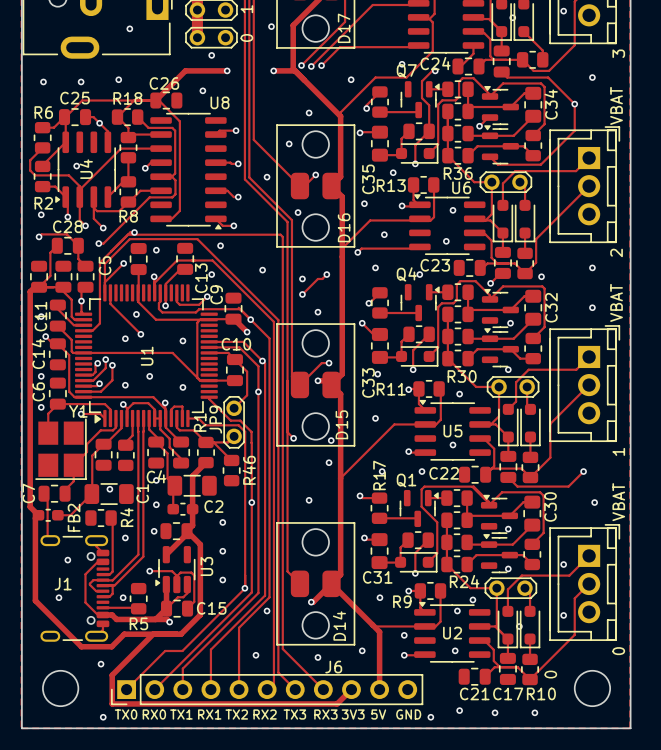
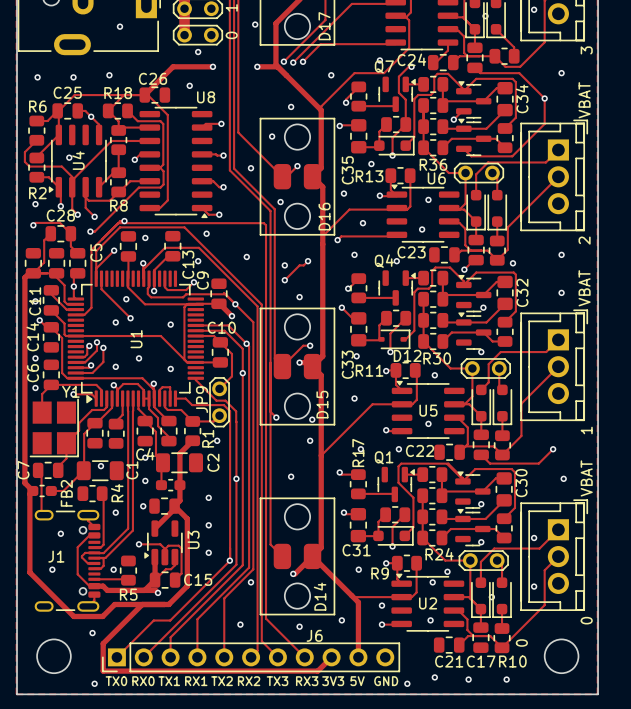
part: (417, 356) -> none
D12: none -> (394, 339)
R1 name position: R1 (200, 422) -> R1 (208, 438)
track: (213, 442) (231, 460) -> none
via: none -> (217, 440)
R46: (231, 470) -> none
C2 name rotation: 0° (213, 506) -> 90° counterclockwise (213, 462)

